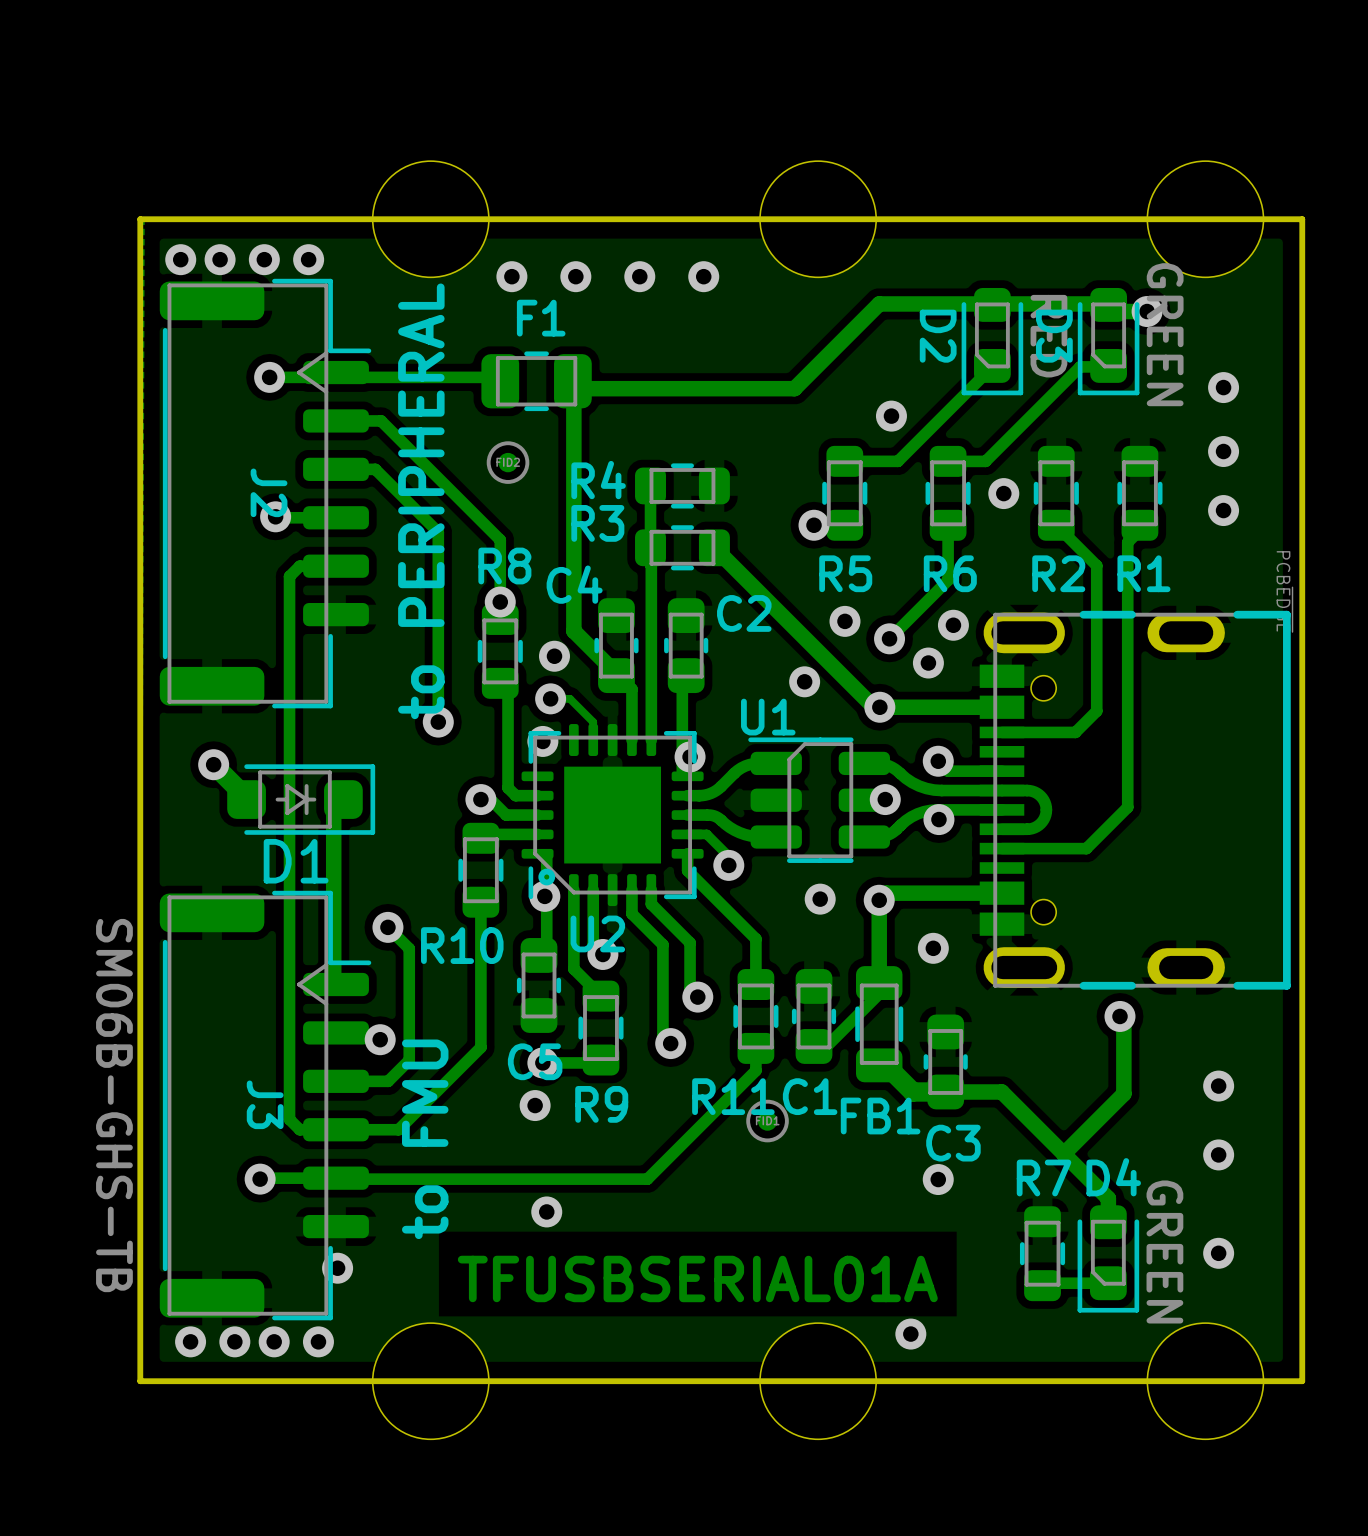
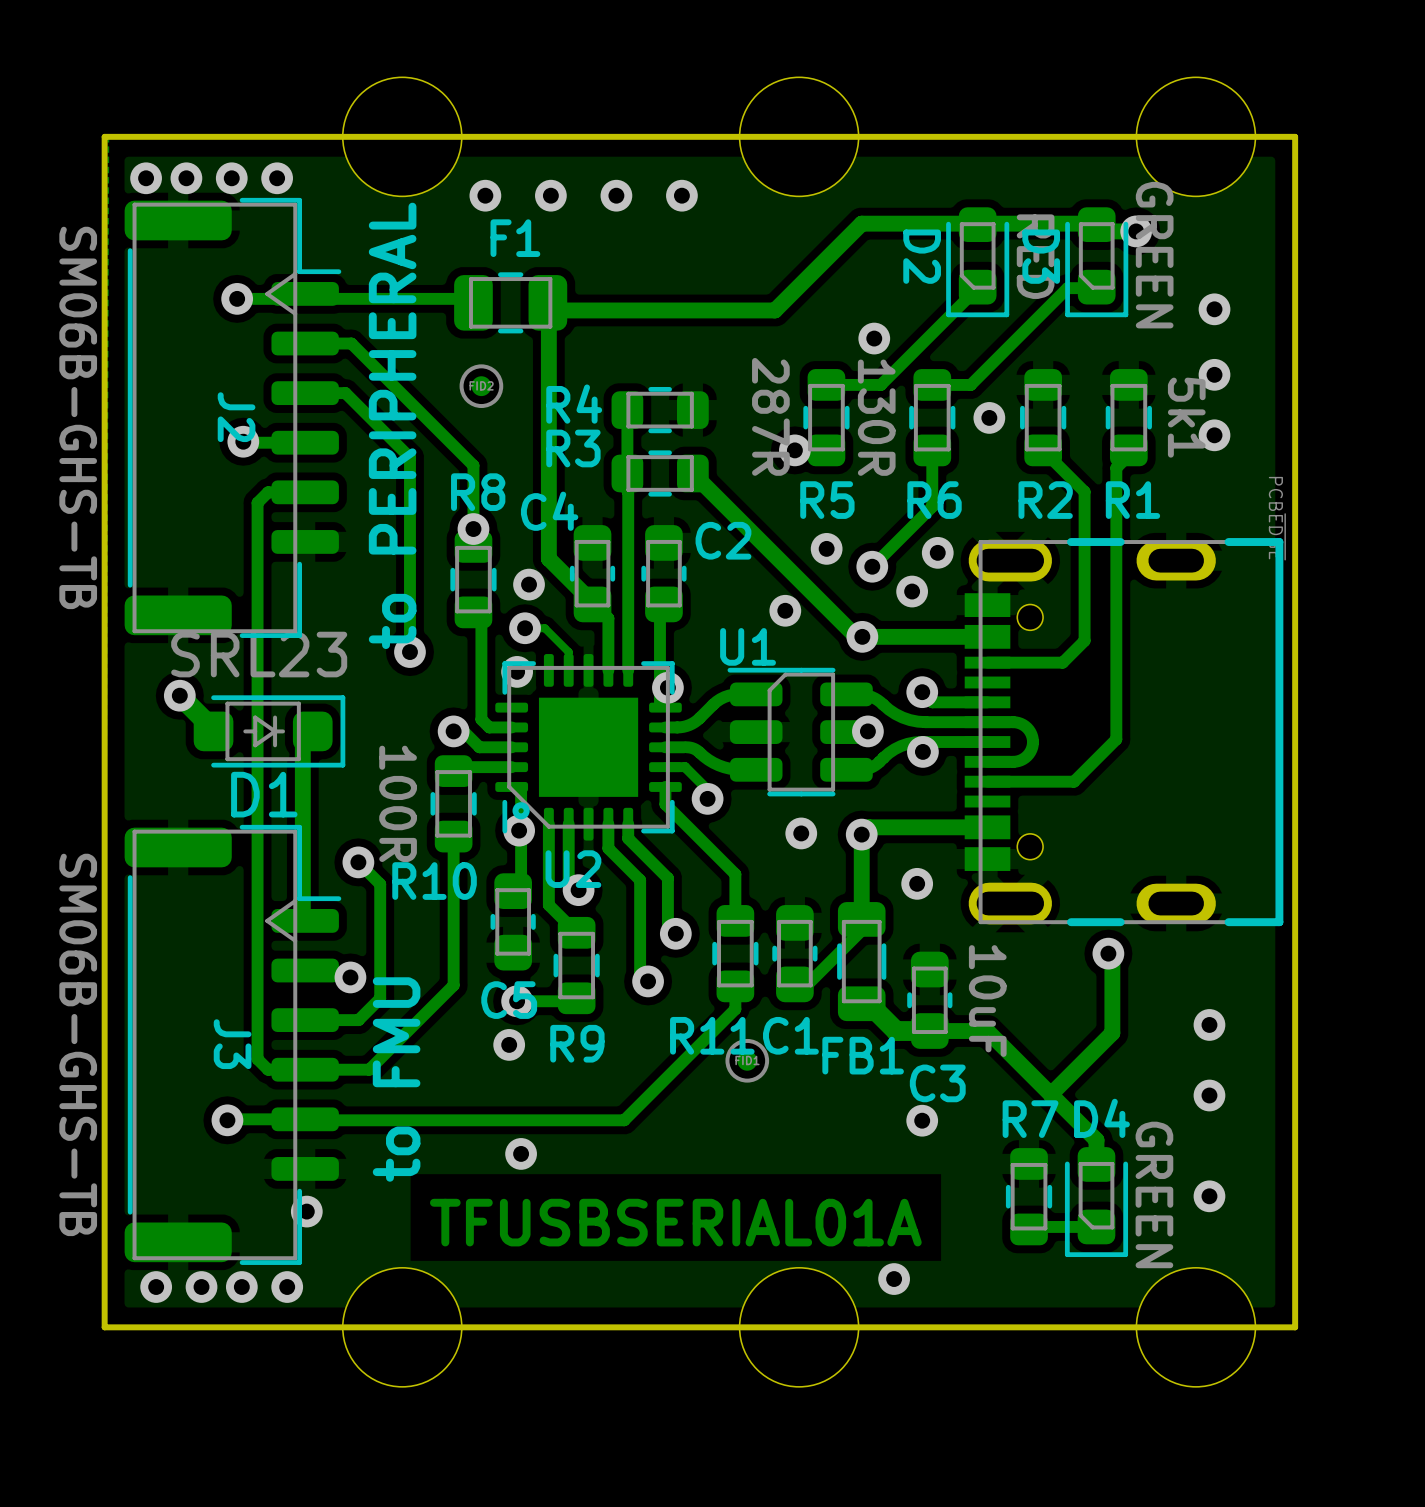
R5 value: none -> 287R (770, 416)
J2 value: none -> SM06B-GHS-TB (78, 417)
R6 value: none -> 130R (876, 417)
R1 value: none -> 5k1 (1186, 417)
D1 value: none -> SRL23 (259, 654)
R10 value: none -> 100R (398, 803)
C3 value: none -> 10uF (987, 1001)

